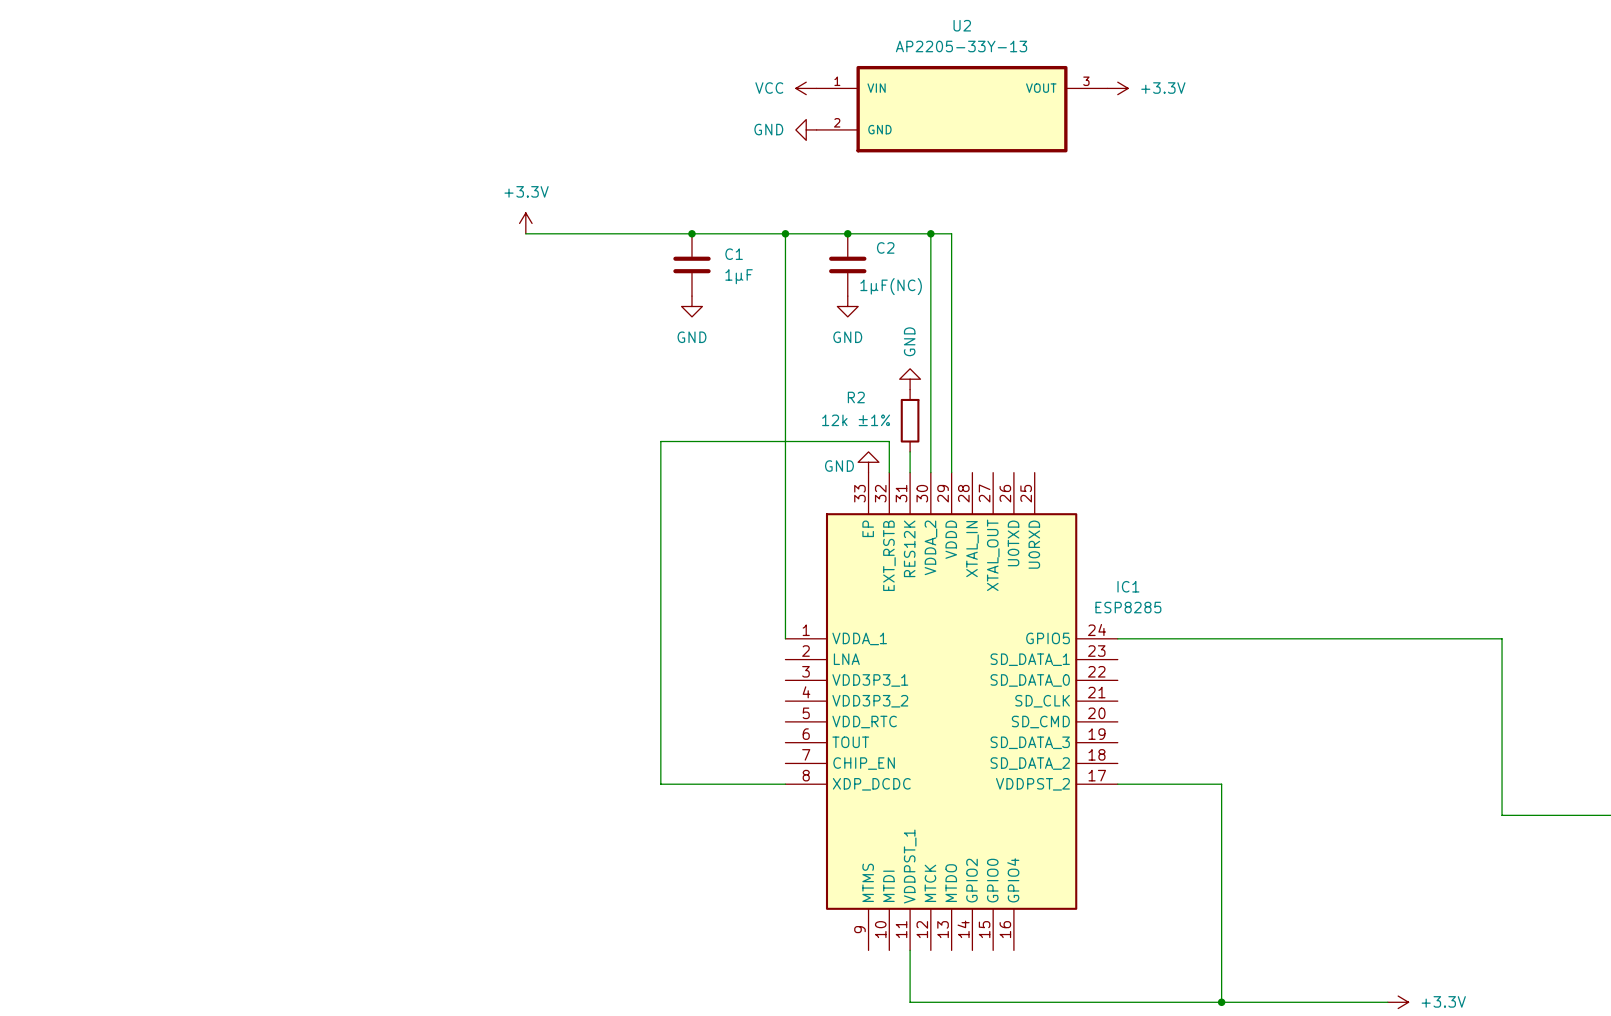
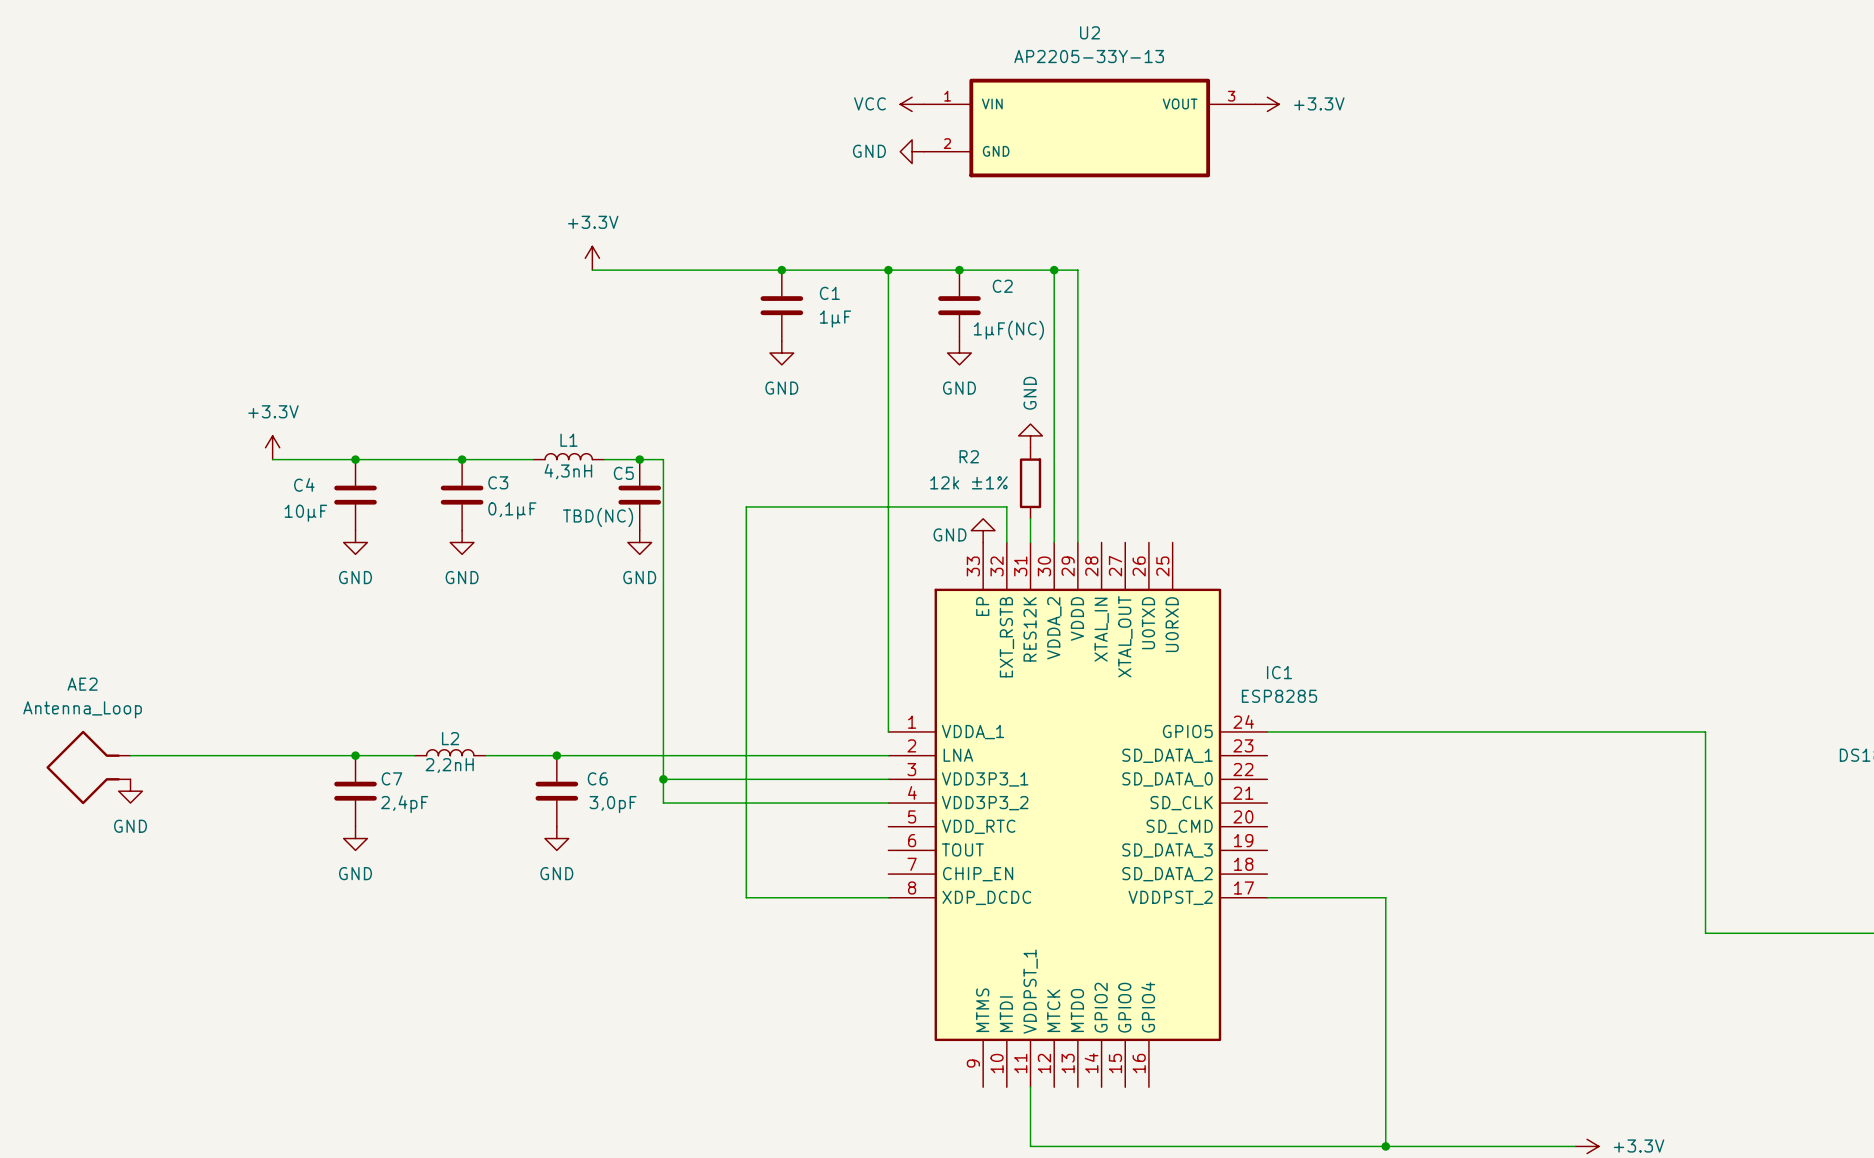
power symbol: none -> +3.3V (272, 447)
L1: none -> 4,3nH (568, 456)
wire: none -> (272, 459) (533, 459)
junction: none -> (355, 459)
junction: none -> (462, 459)
wire: none -> (604, 459) (663, 459) (663, 803) (888, 803)
junction: none -> (639, 459)
C4: none -> 10μF (355, 495)
C3: none -> 0,1μF (462, 495)
C5: none -> TBD(NC) (639, 495)
power symbol: none -> GND (355, 542)
power symbol: none -> GND (462, 542)
power symbol: none -> GND (639, 542)
L2: none -> 2,2nH (450, 752)
wire: none -> (130, 755) (414, 755)
junction: none -> (355, 755)
wire: none -> (485, 755) (888, 755)
junction: none -> (556, 755)
AE2: none -> Antenna_Loop (88, 767)
wire: none -> (663, 779) (888, 779)
junction: none -> (663, 779)
power symbol: none -> GND (130, 791)
C7: none -> 2,4pF (355, 791)
C6: none -> 3,0pF (556, 791)
power symbol: none -> GND (355, 838)
power symbol: none -> GND (556, 838)

